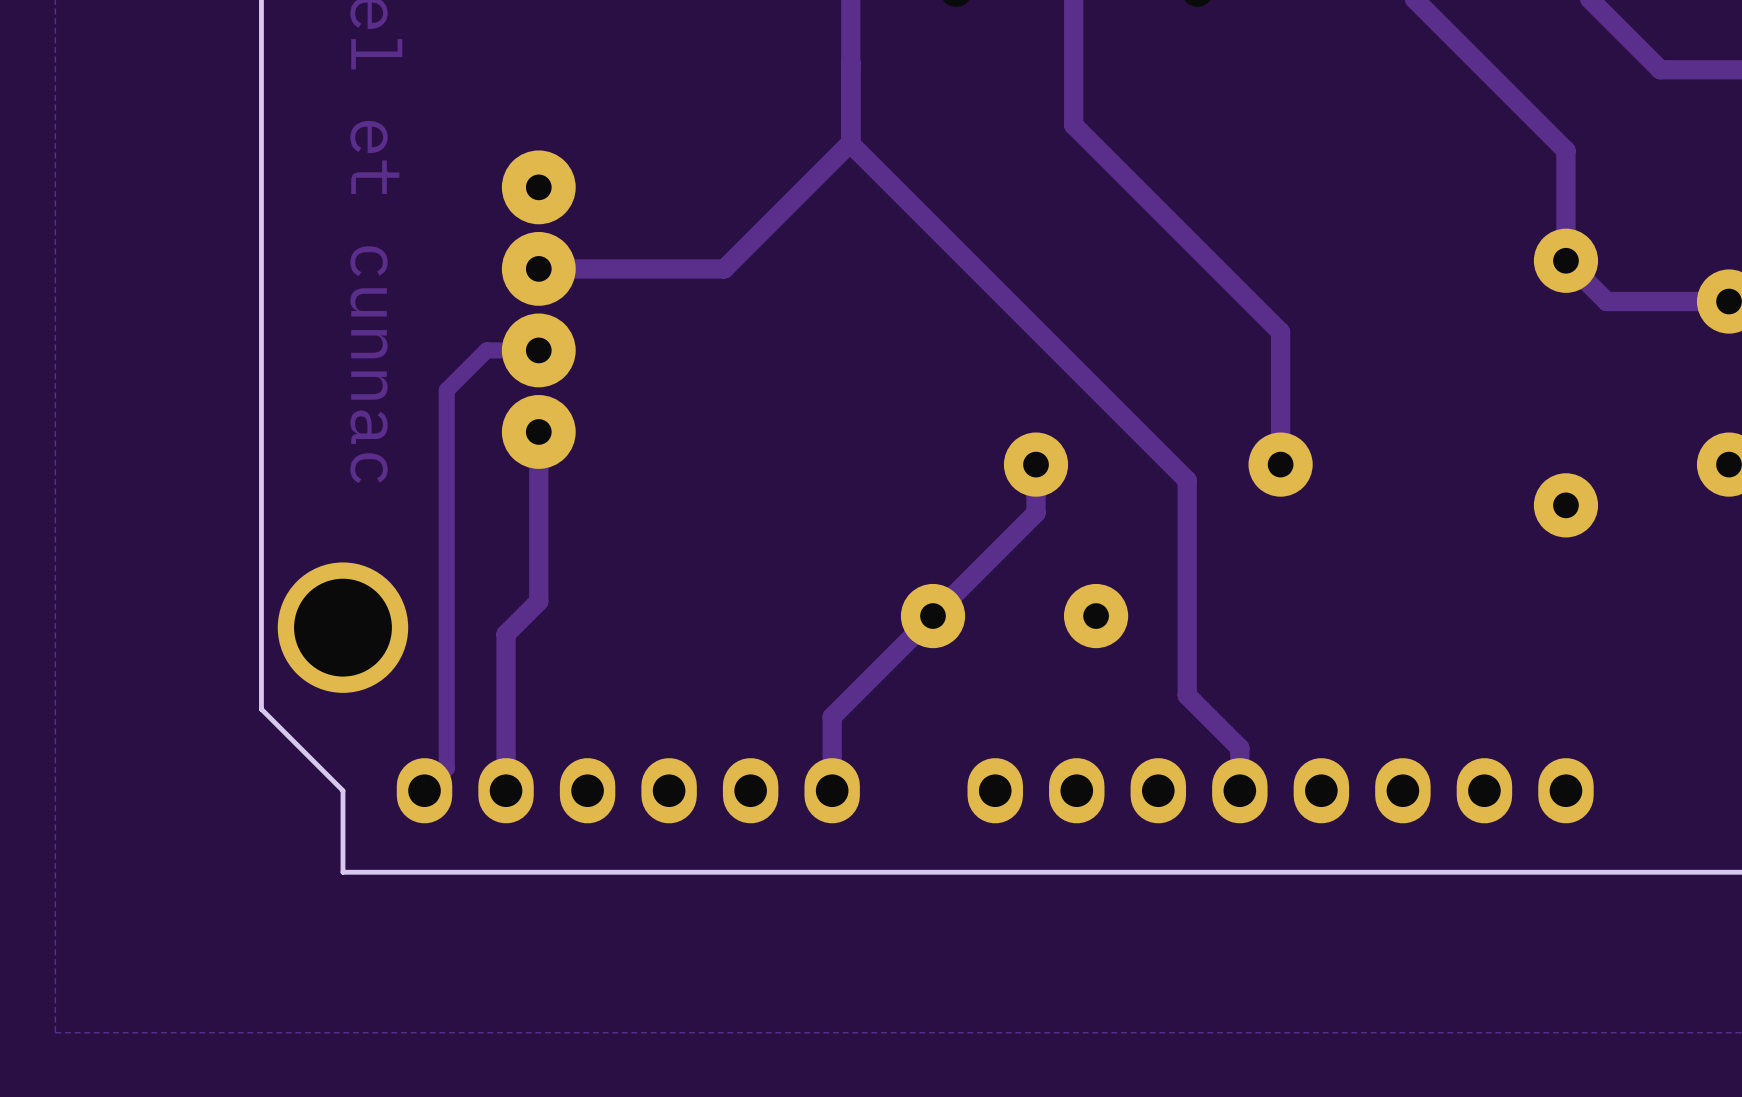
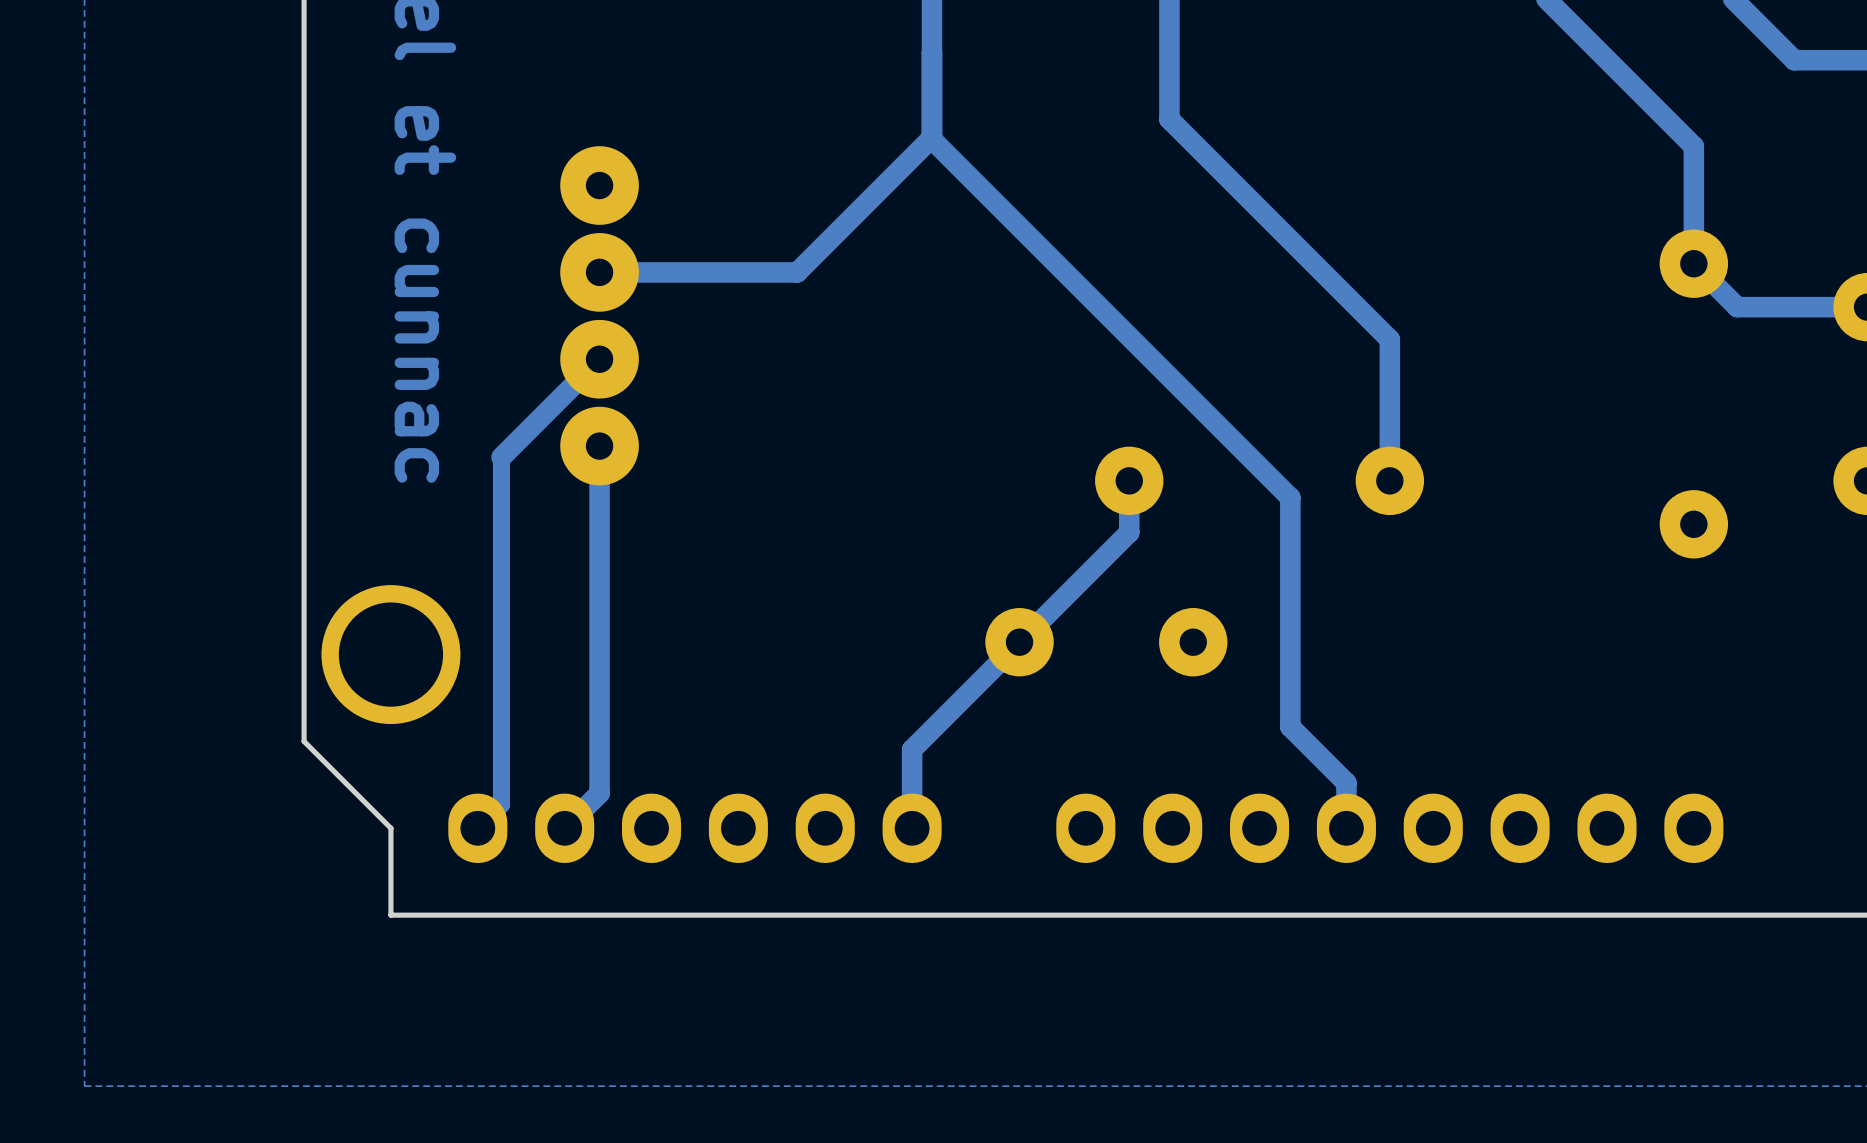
track: (538, 350) (486, 350) (446, 390) (446, 442) -> (599, 359) (501, 457)
track: (538, 601) (506, 634) (506, 786) -> (599, 626) (599, 793) (564, 828)

